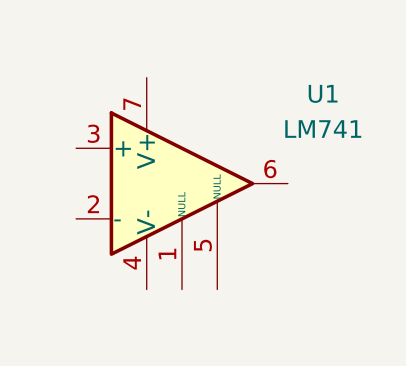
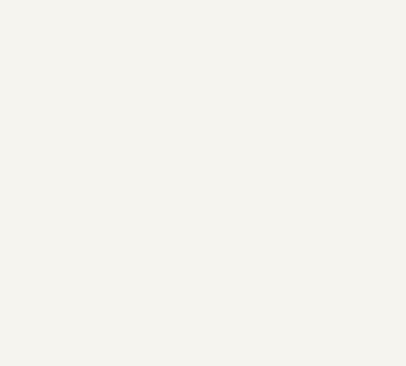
U1: LM741 (182, 183) -> none

